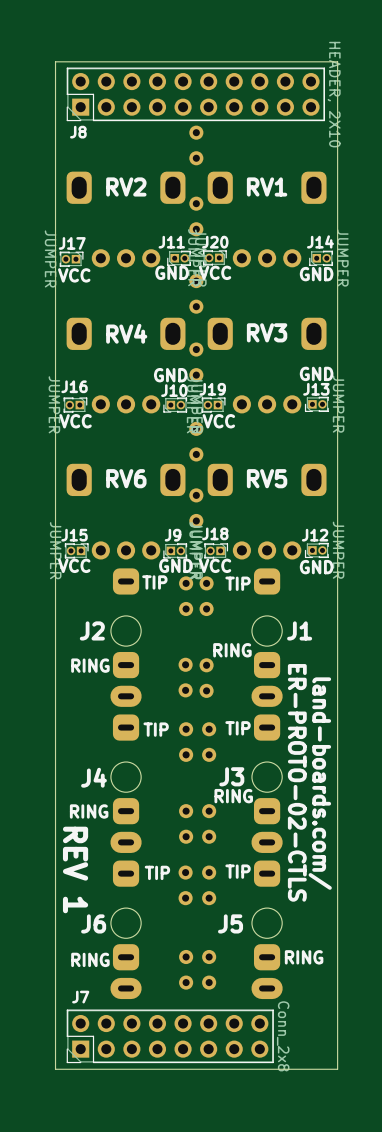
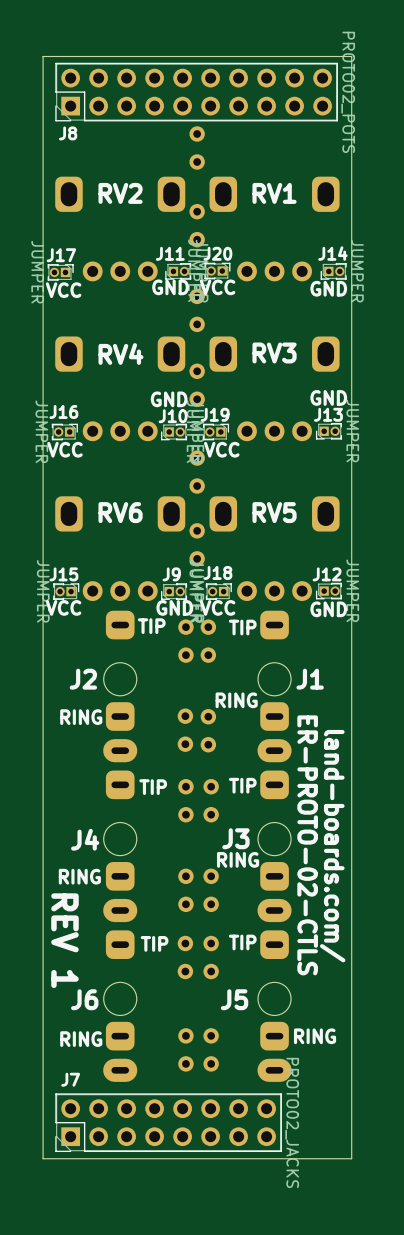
J8 value: HEADER, 2X10 (334, 94) -> PROTO02_POTS (348, 92)
J7 value: Conn_2x8 (283, 1036) -> PROTO02_JACKS (292, 1122)

